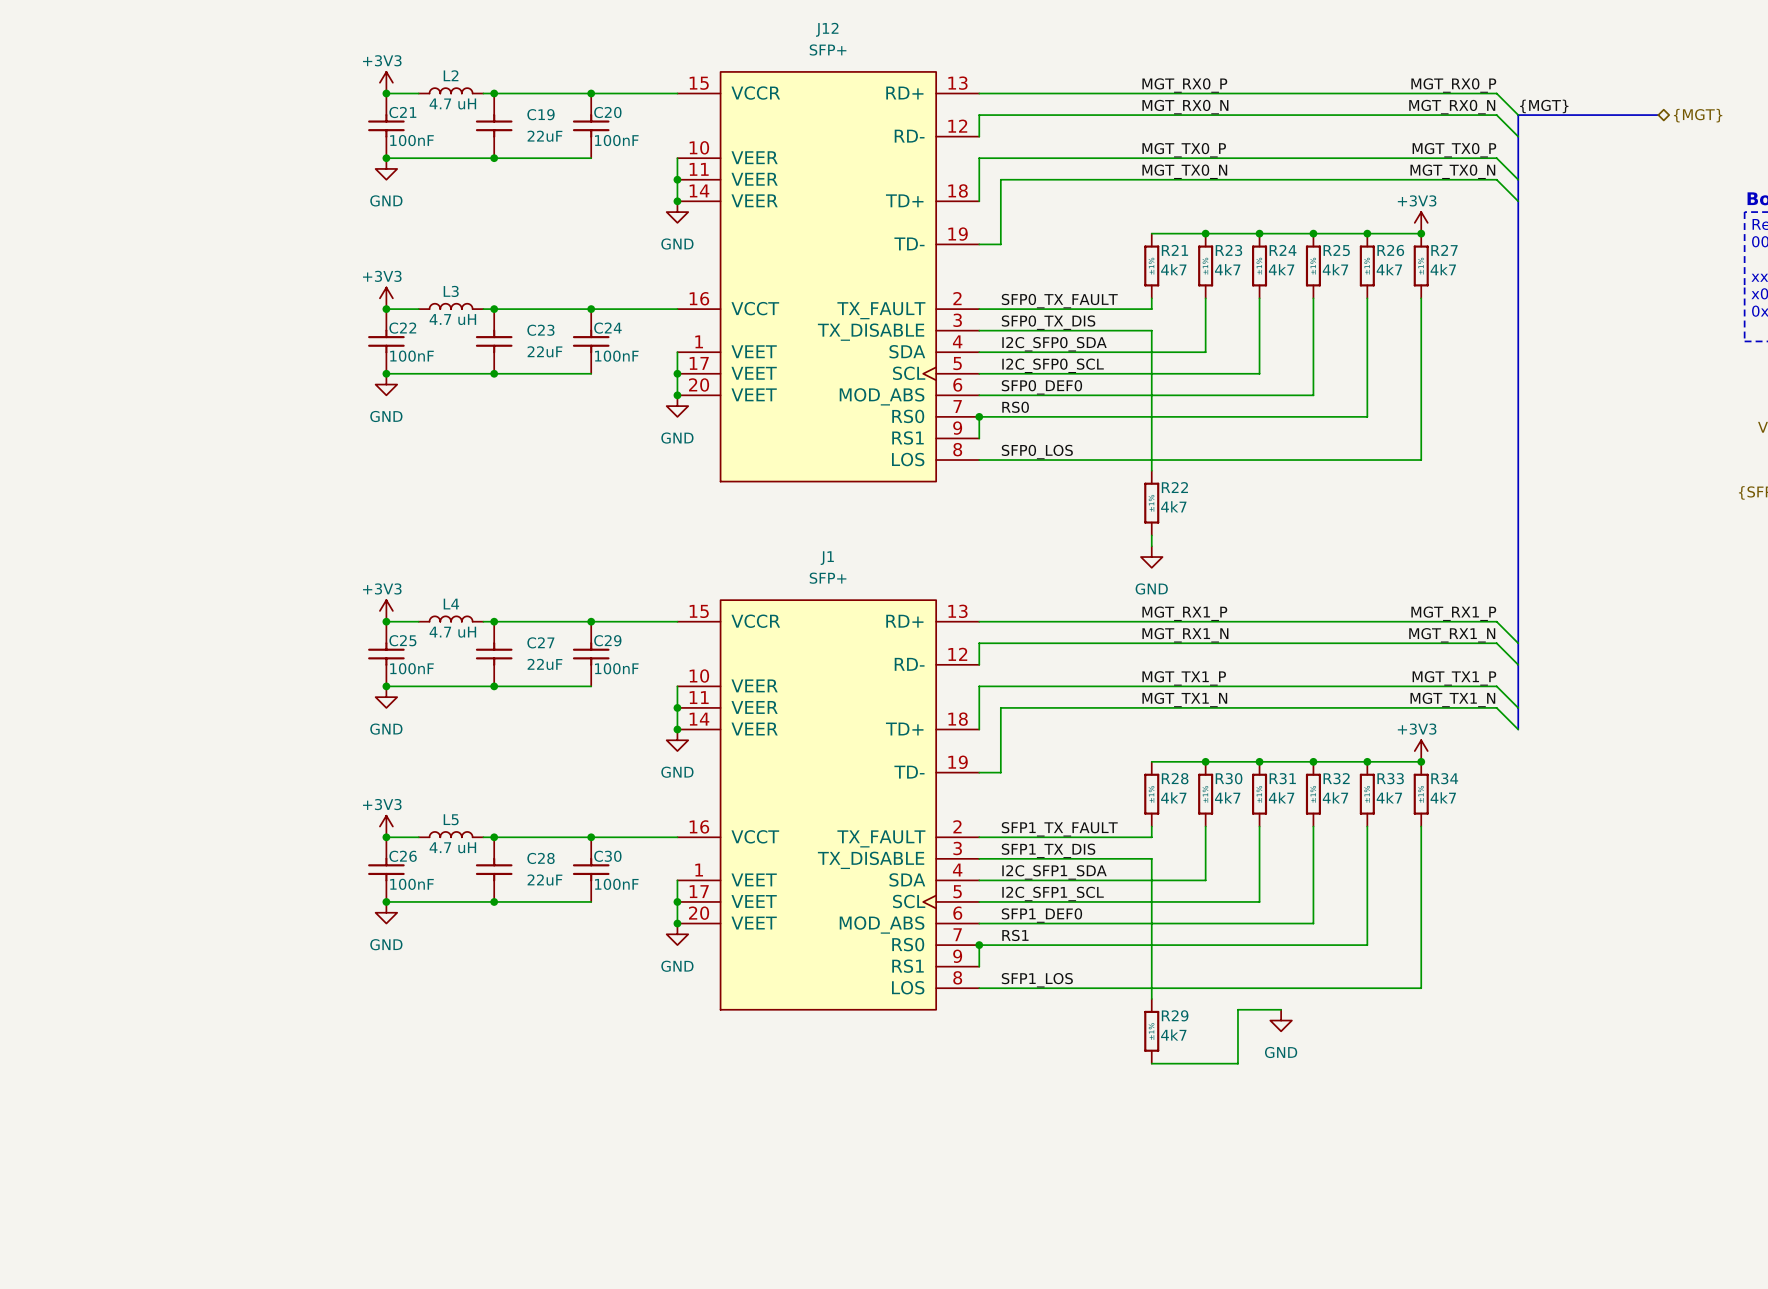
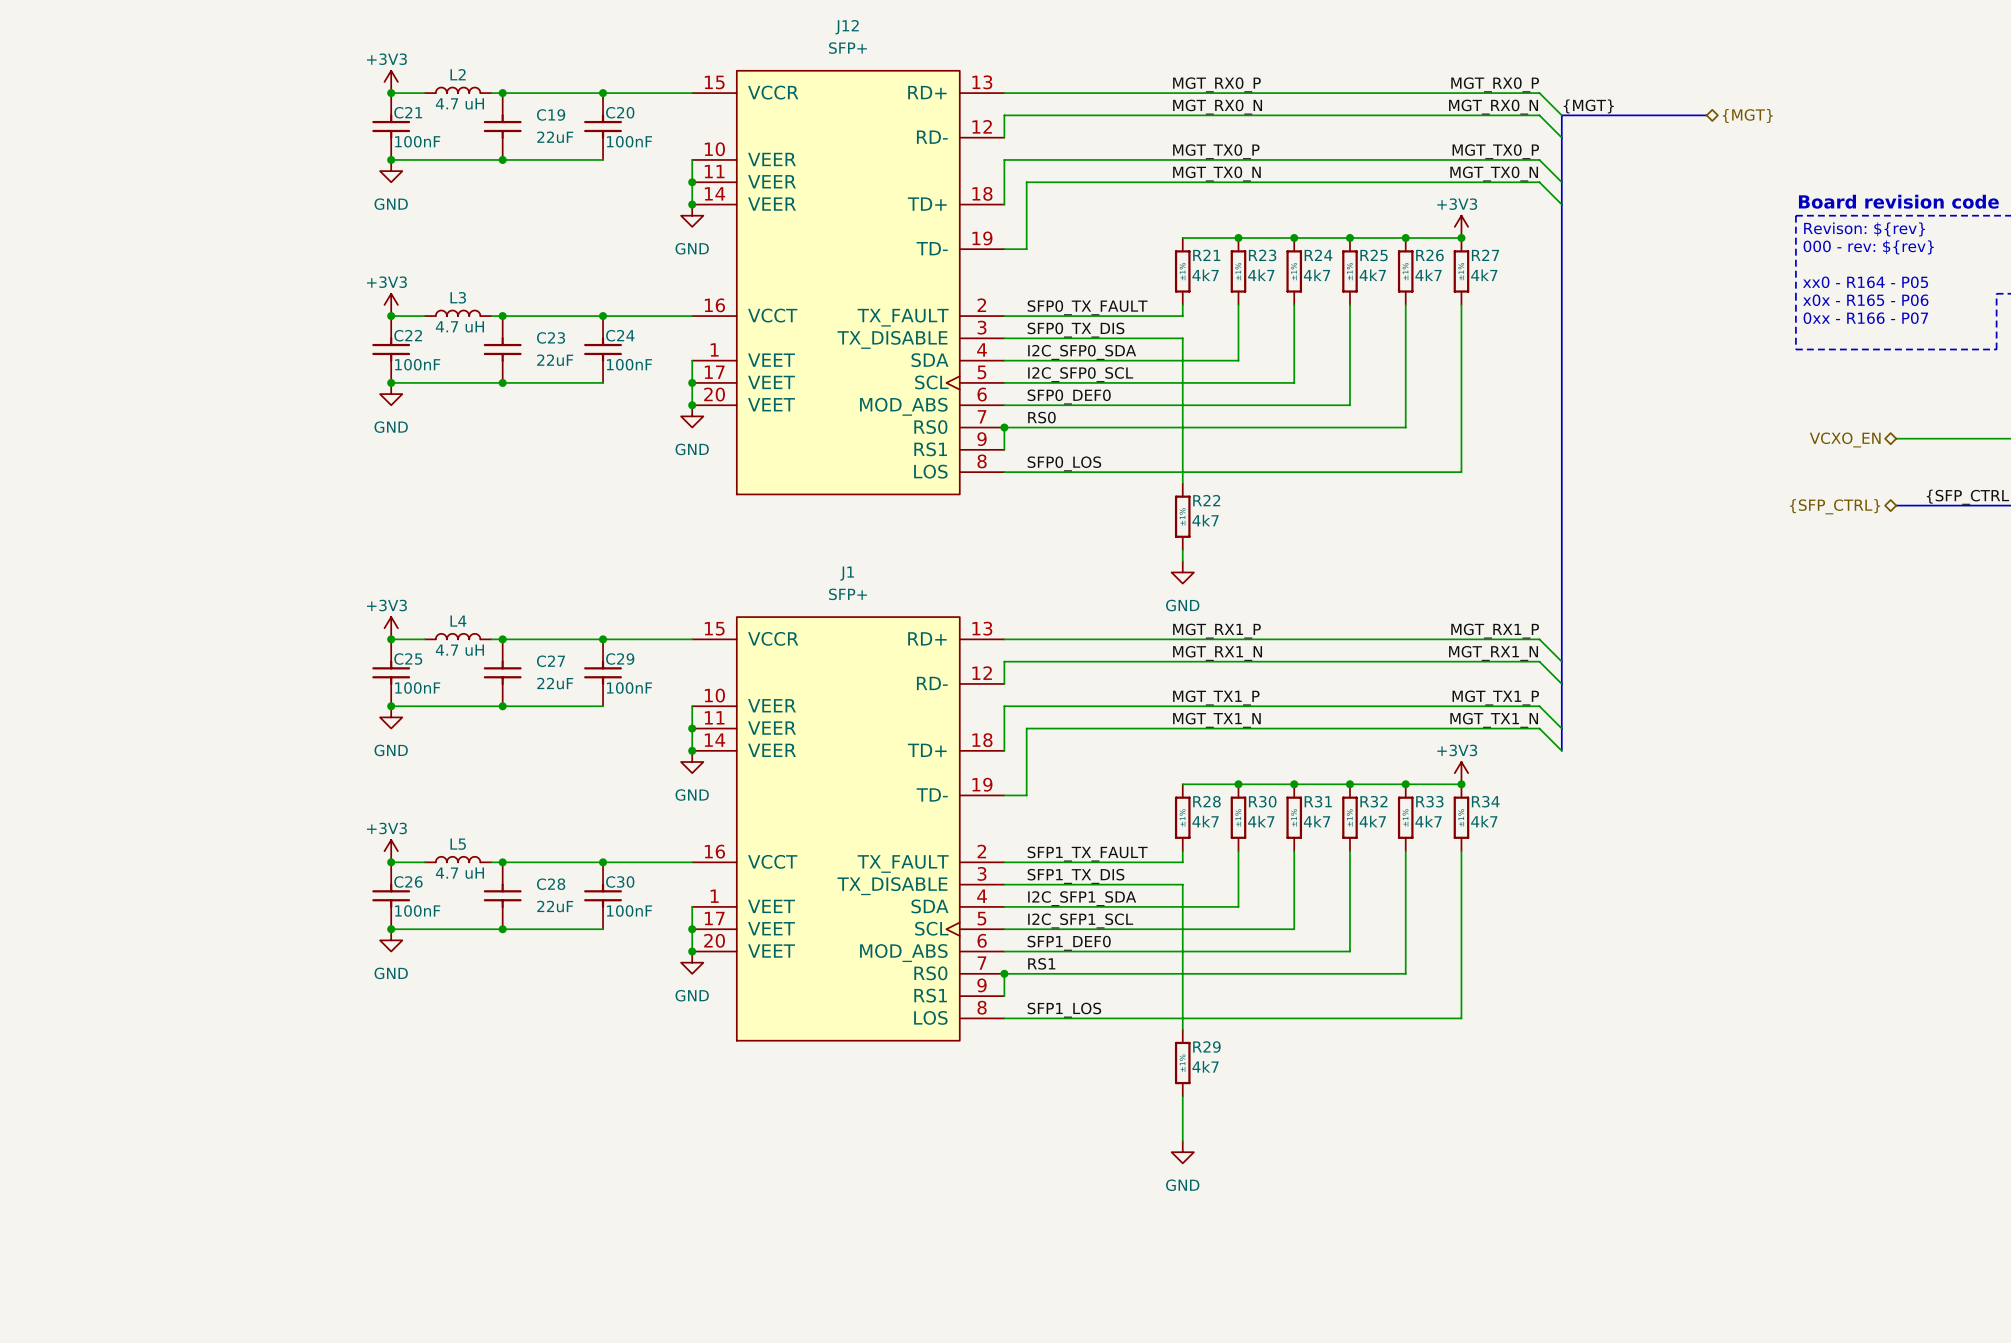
wire: (1281, 1009) (1237, 1009) (1237, 1063) (1151, 1063) -> (1182, 1141) (1182, 1096)
power symbol position: GND (1281, 1020) -> GND (1182, 1152)

